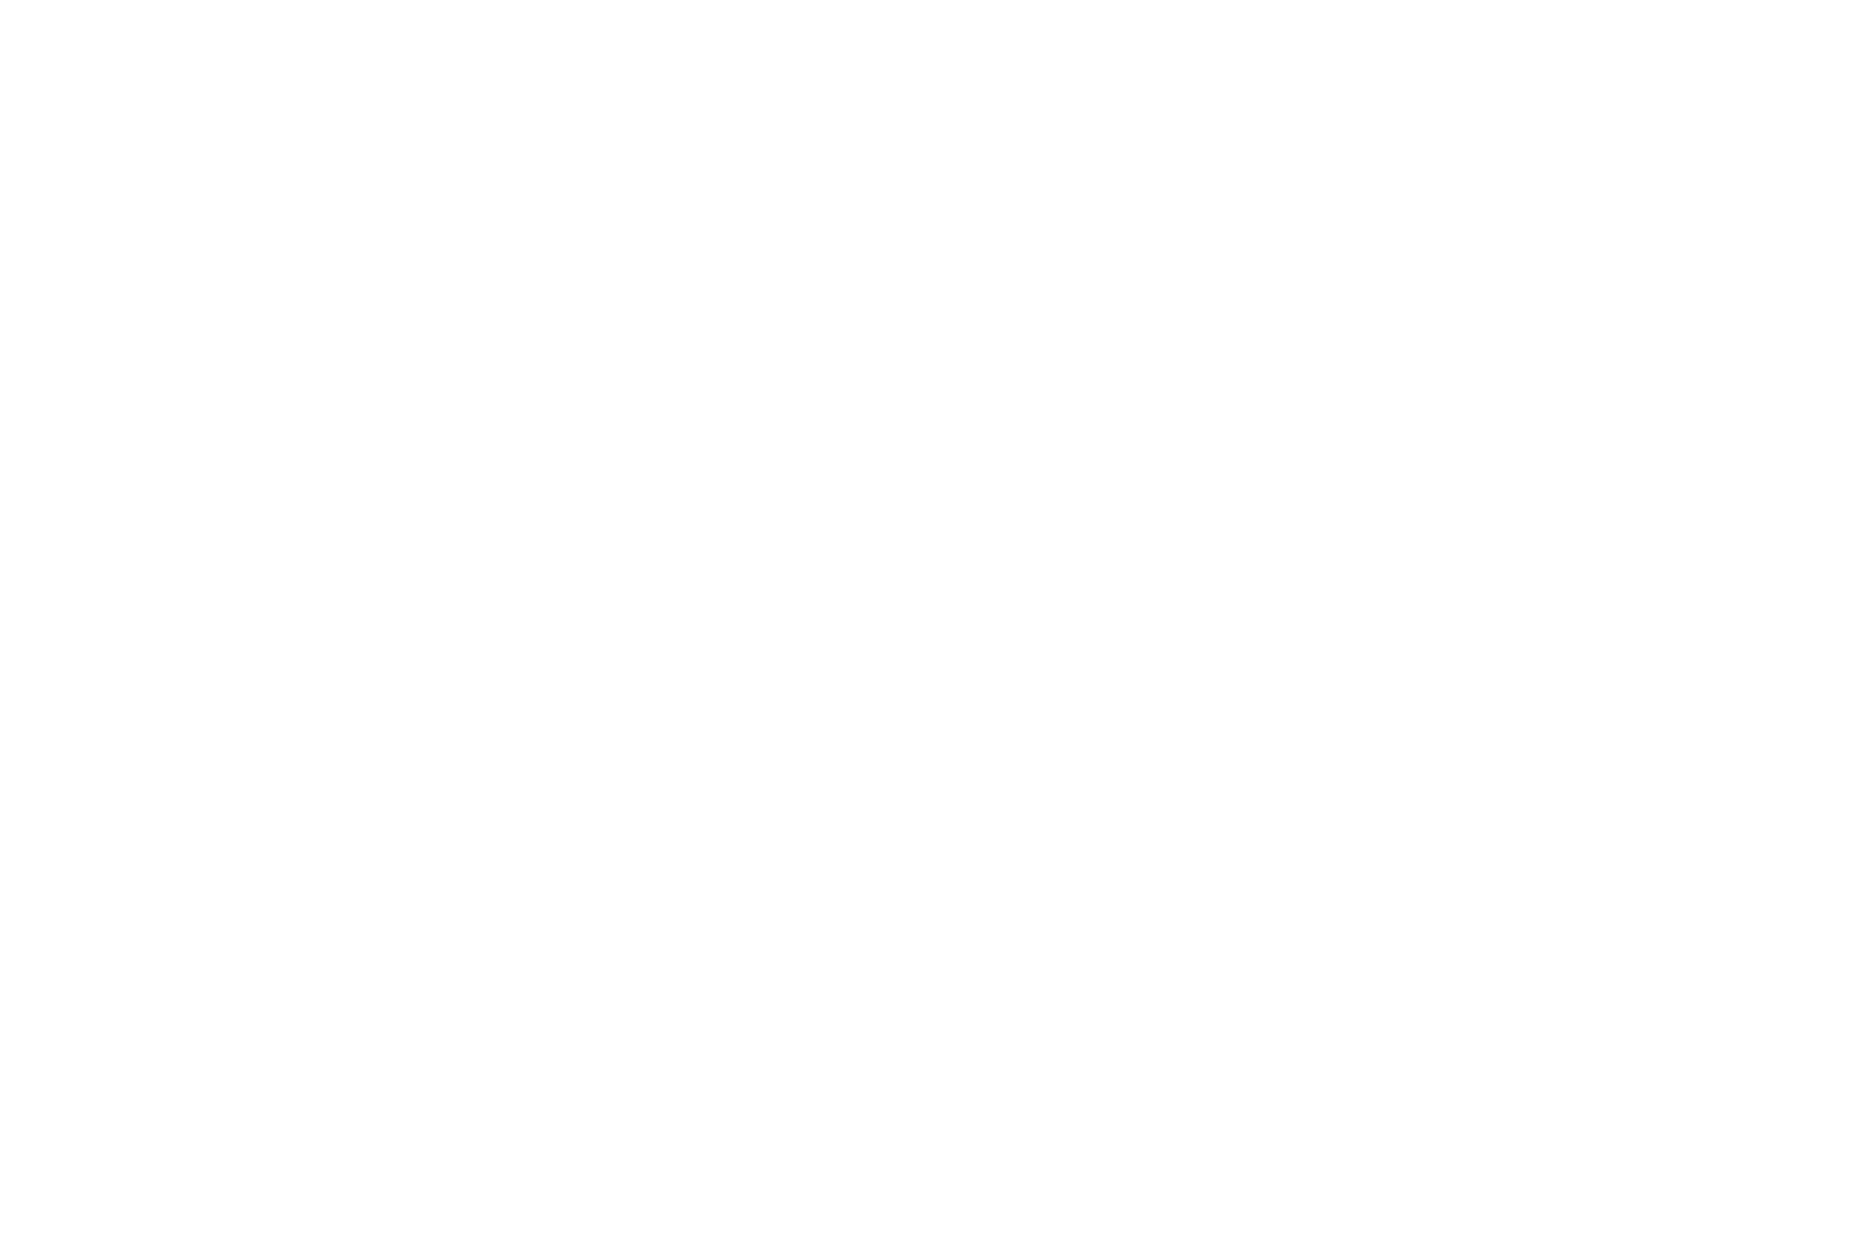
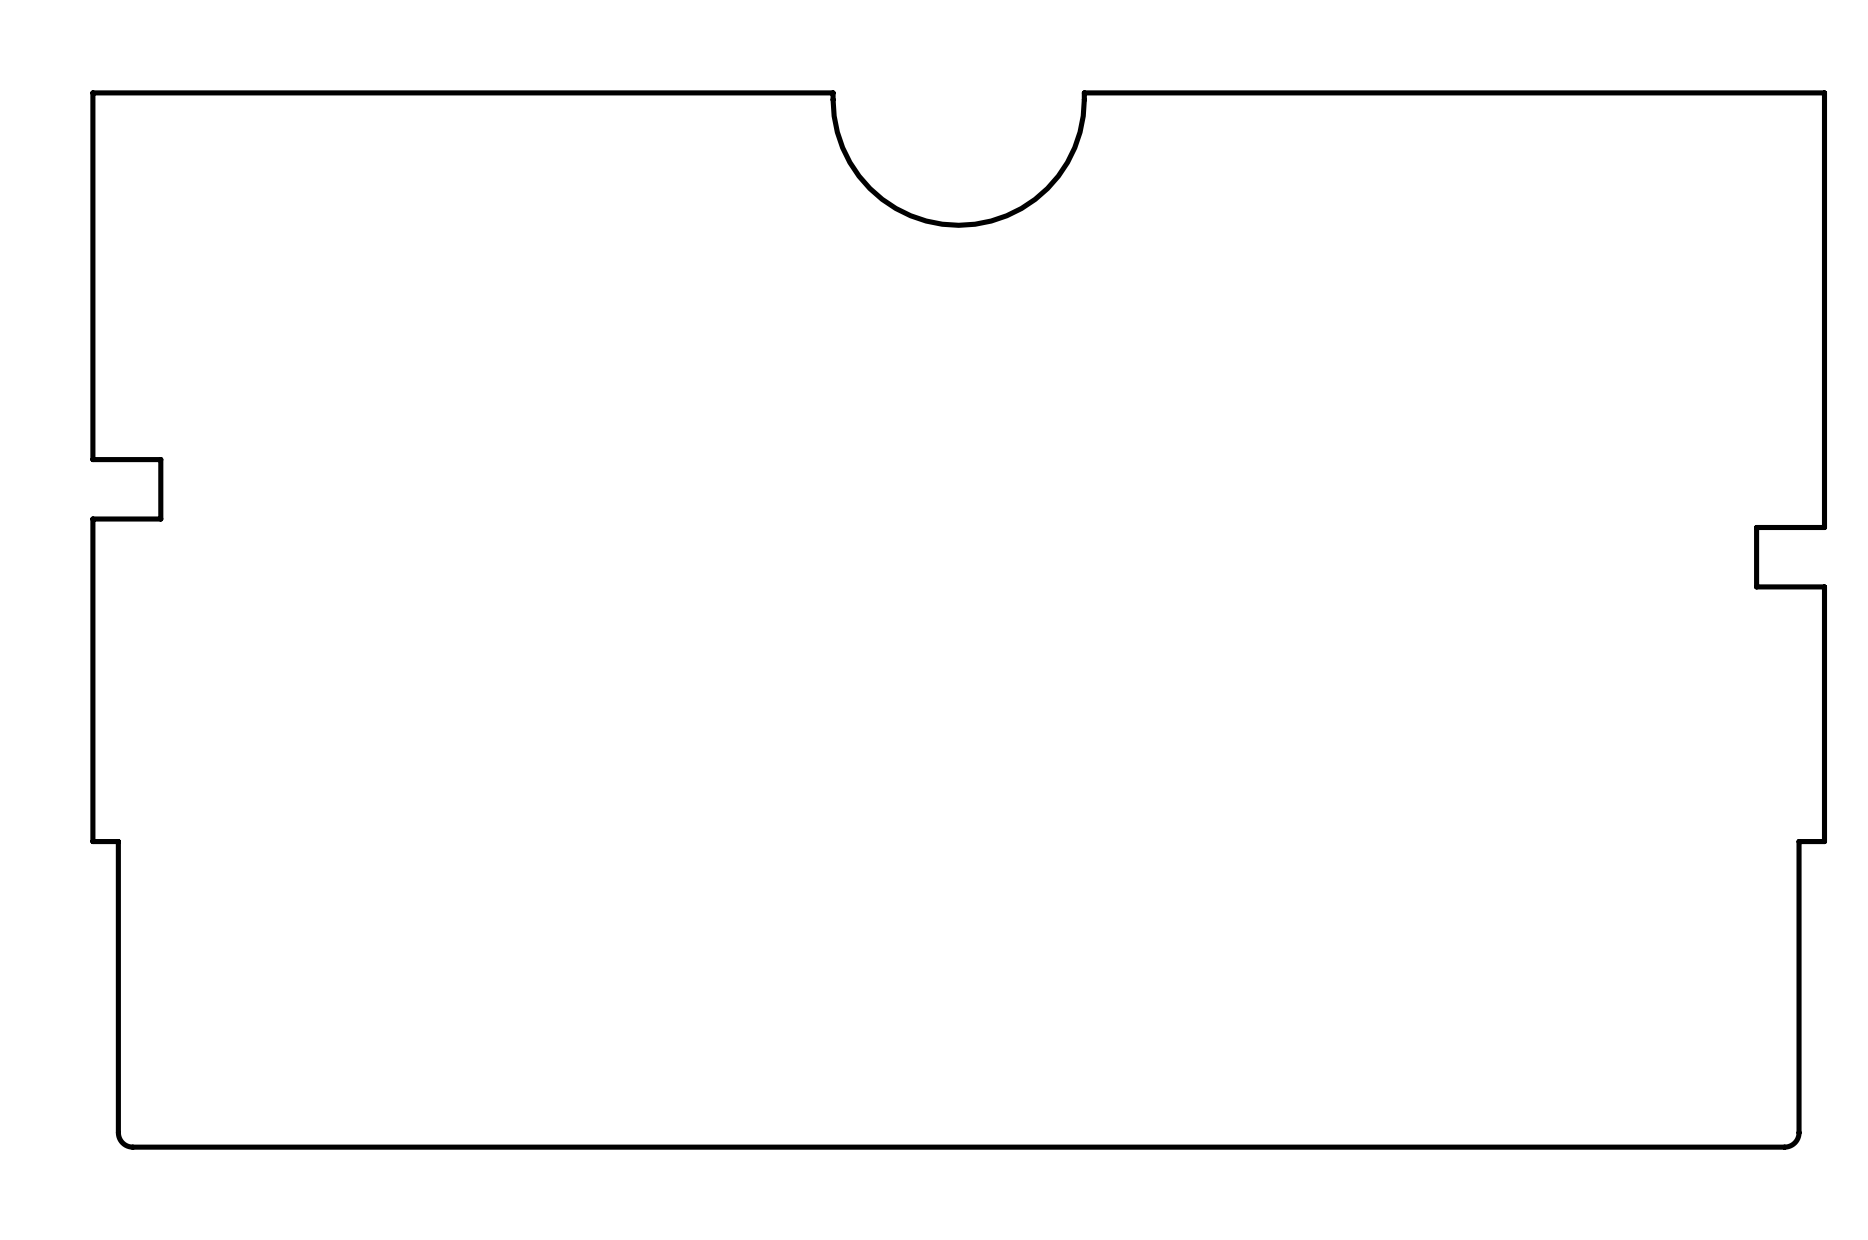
board edge: none -> (1824, 92) (1084, 92) (1083, 116) (1074, 147) (1058, 176) (1047, 188) (1021, 208) (1006, 215) (991, 221) (958, 225) (926, 221) (910, 215) (882, 199) (869, 188) (859, 176) (842, 147) (834, 116) (833, 92) (92, 92) (92, 459) (160, 459) (160, 519) (92, 519) (92, 841) (118, 841) (118, 1132) (120, 1139) (125, 1145) (132, 1147) (1784, 1147) (1791, 1145) (1797, 1139) (1799, 1132) (1799, 841) (1824, 841) (1824, 586) (1756, 586) (1756, 527) (1824, 527) (1824, 92)

